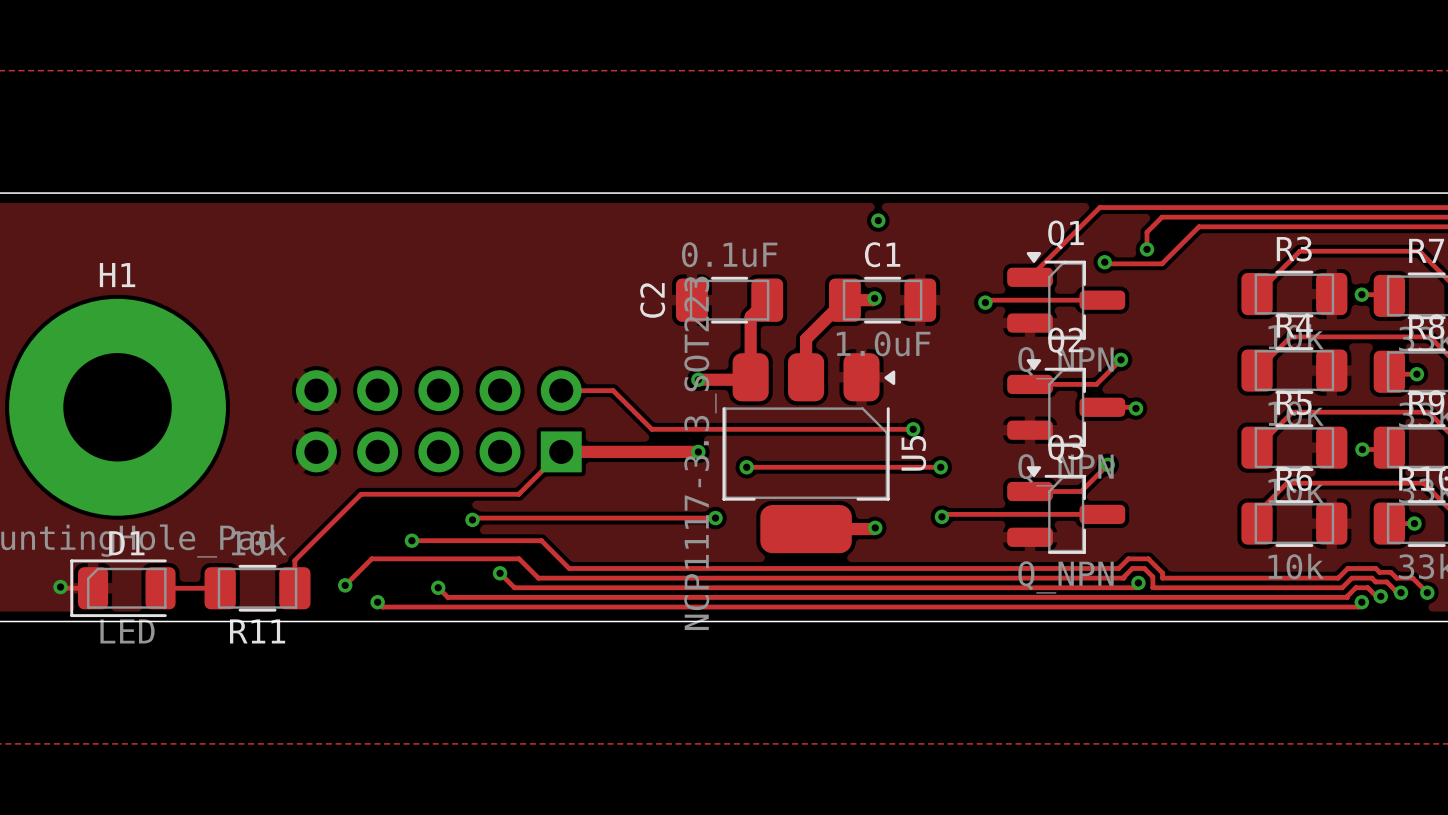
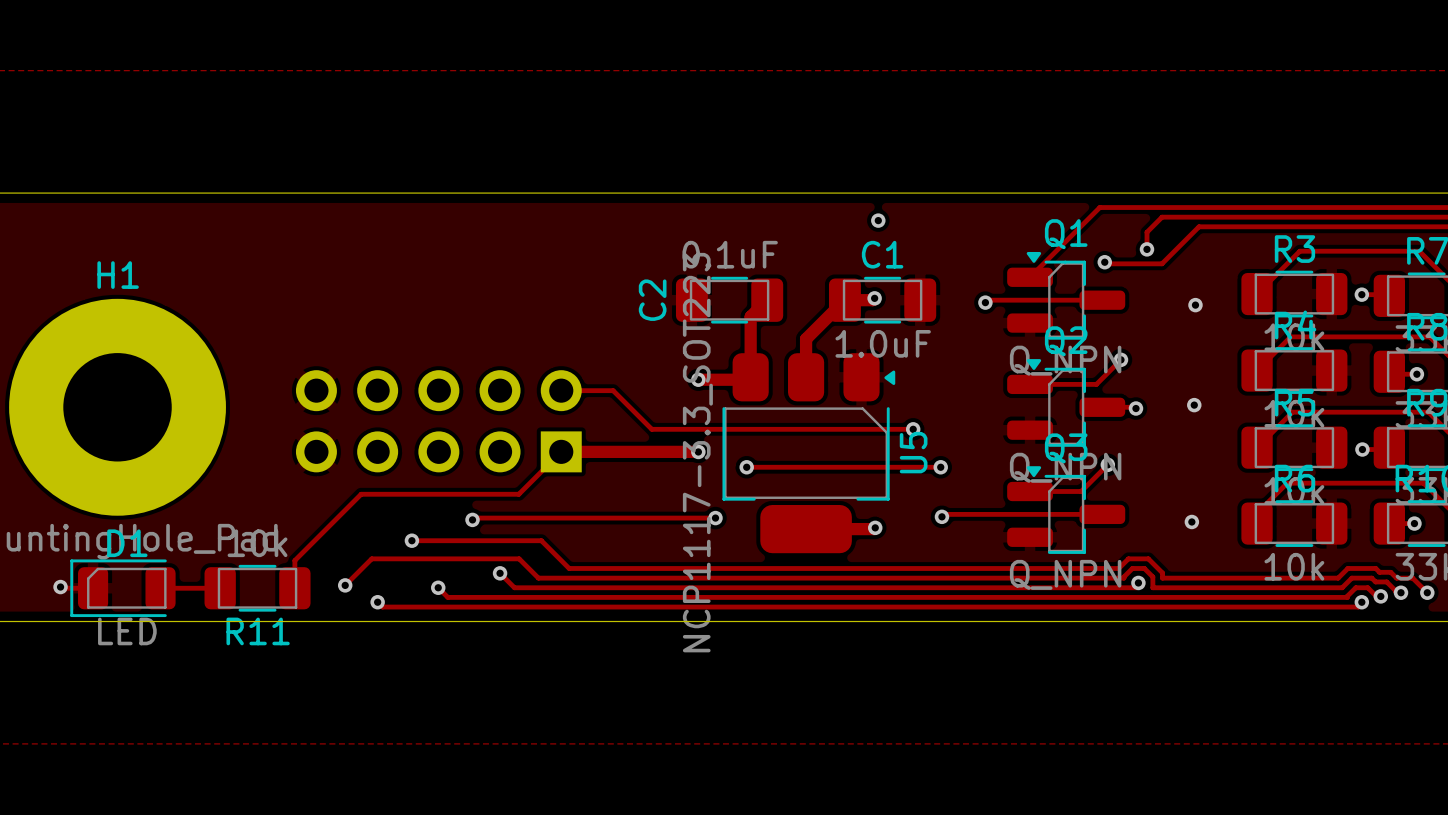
via: none -> (1195, 305)
via: none -> (1194, 405)
via: none -> (1191, 521)

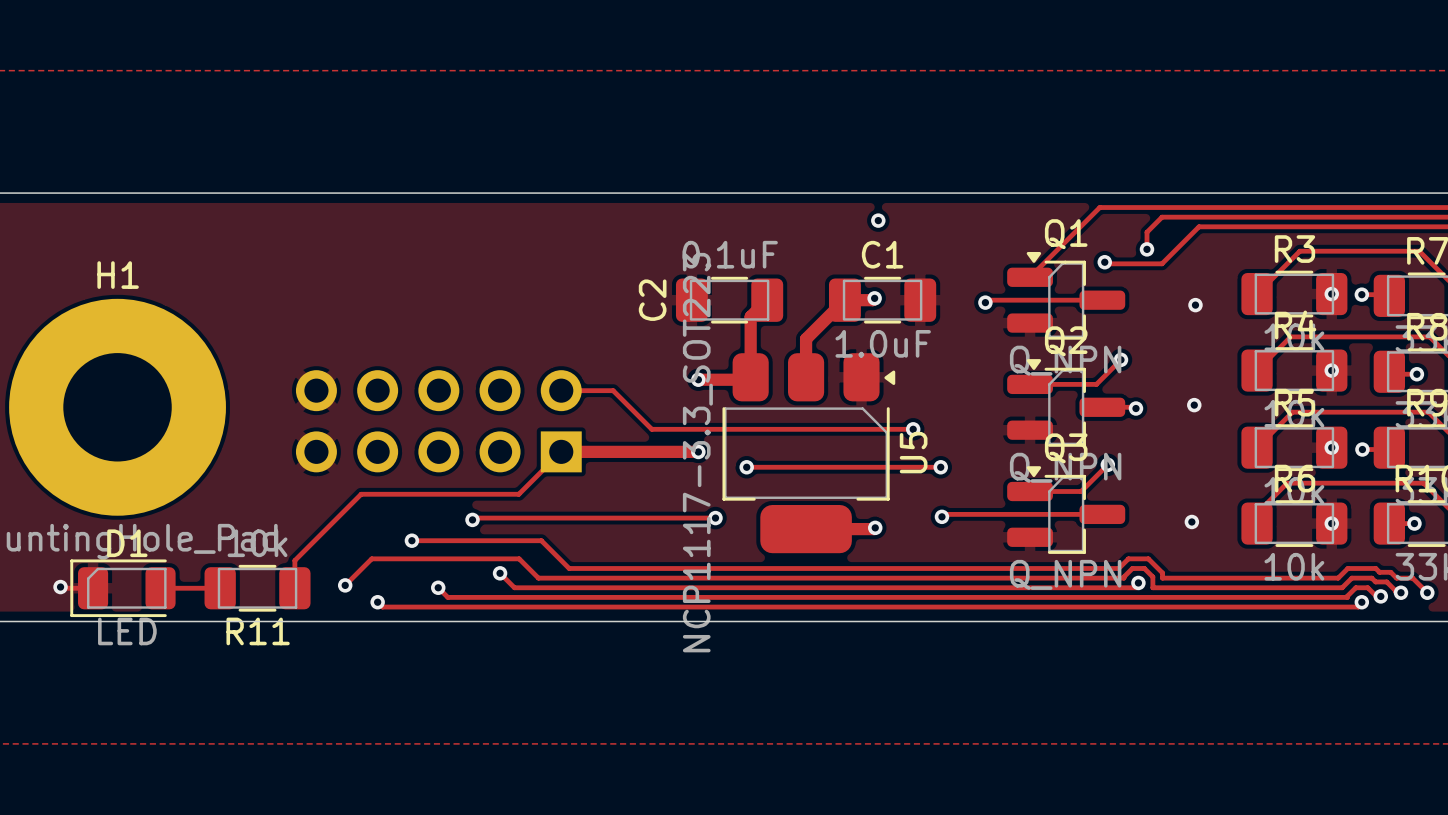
via: none -> (1331, 294)
via: none -> (1331, 370)
via: none -> (1331, 447)
via: none -> (1331, 523)

